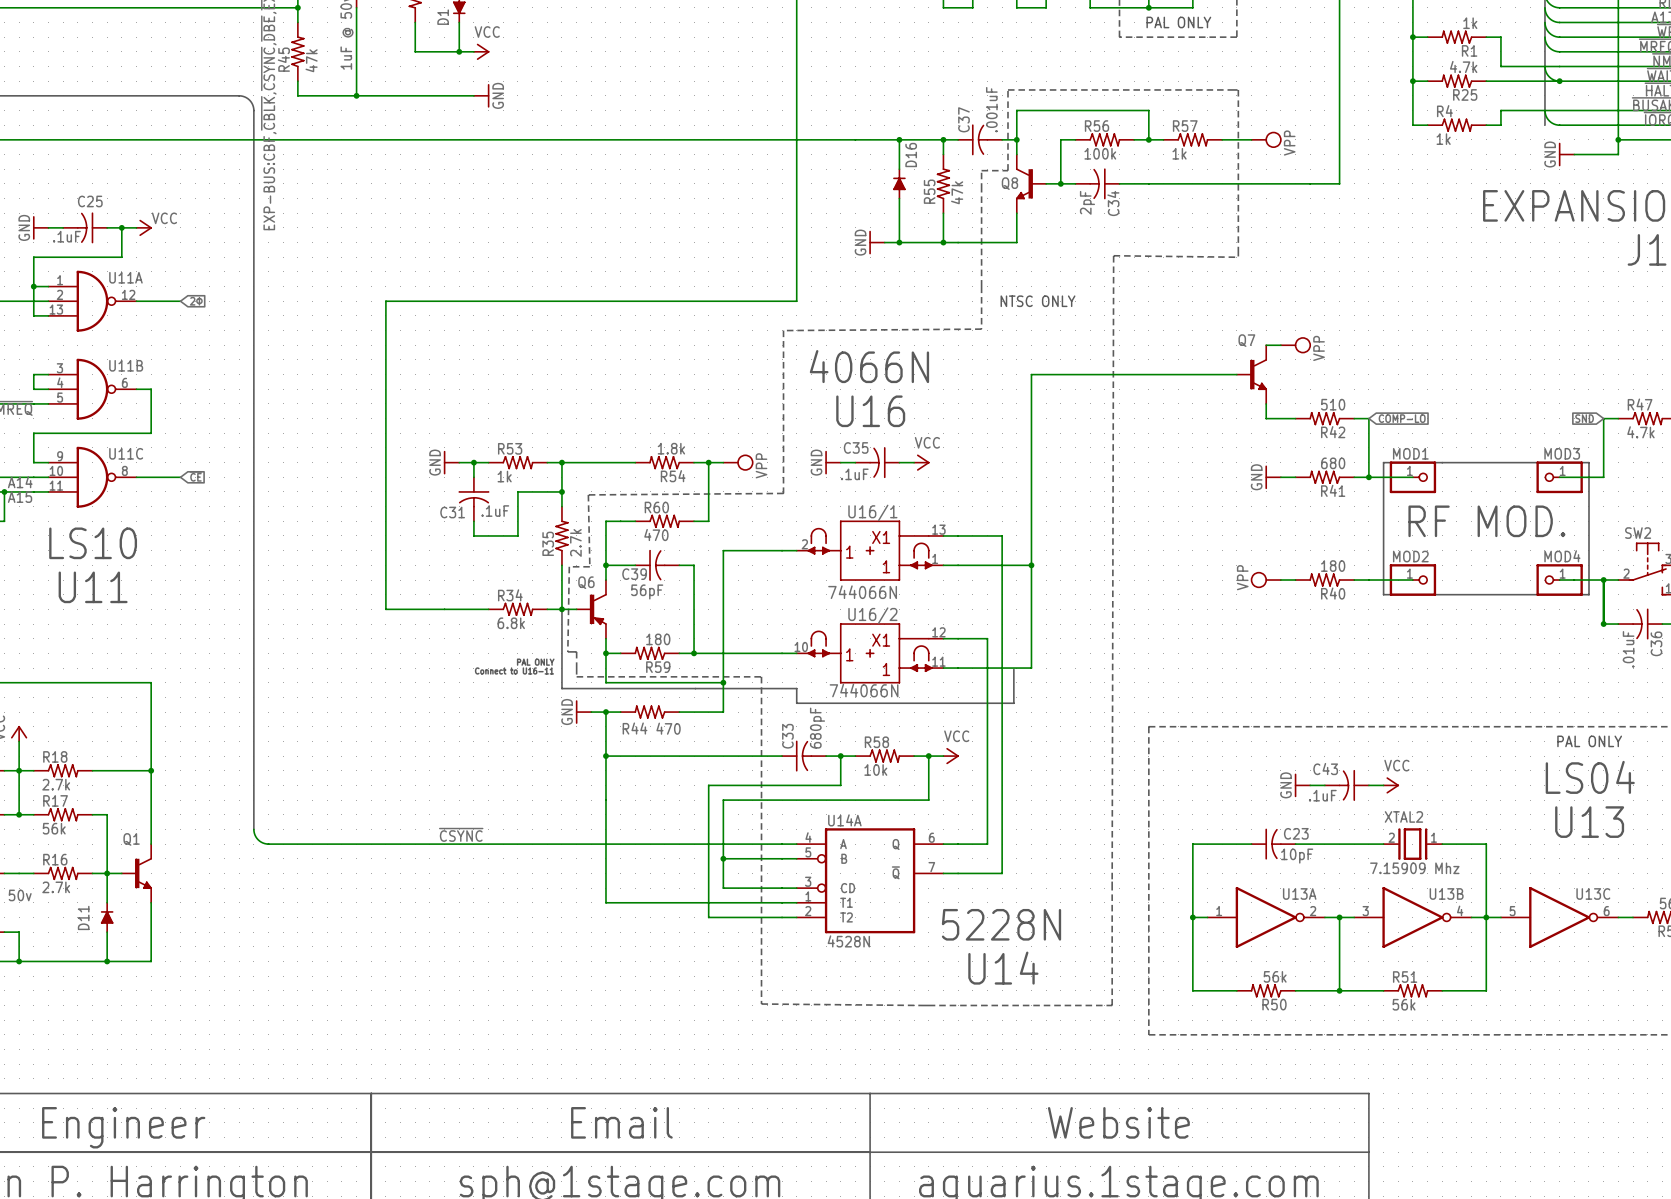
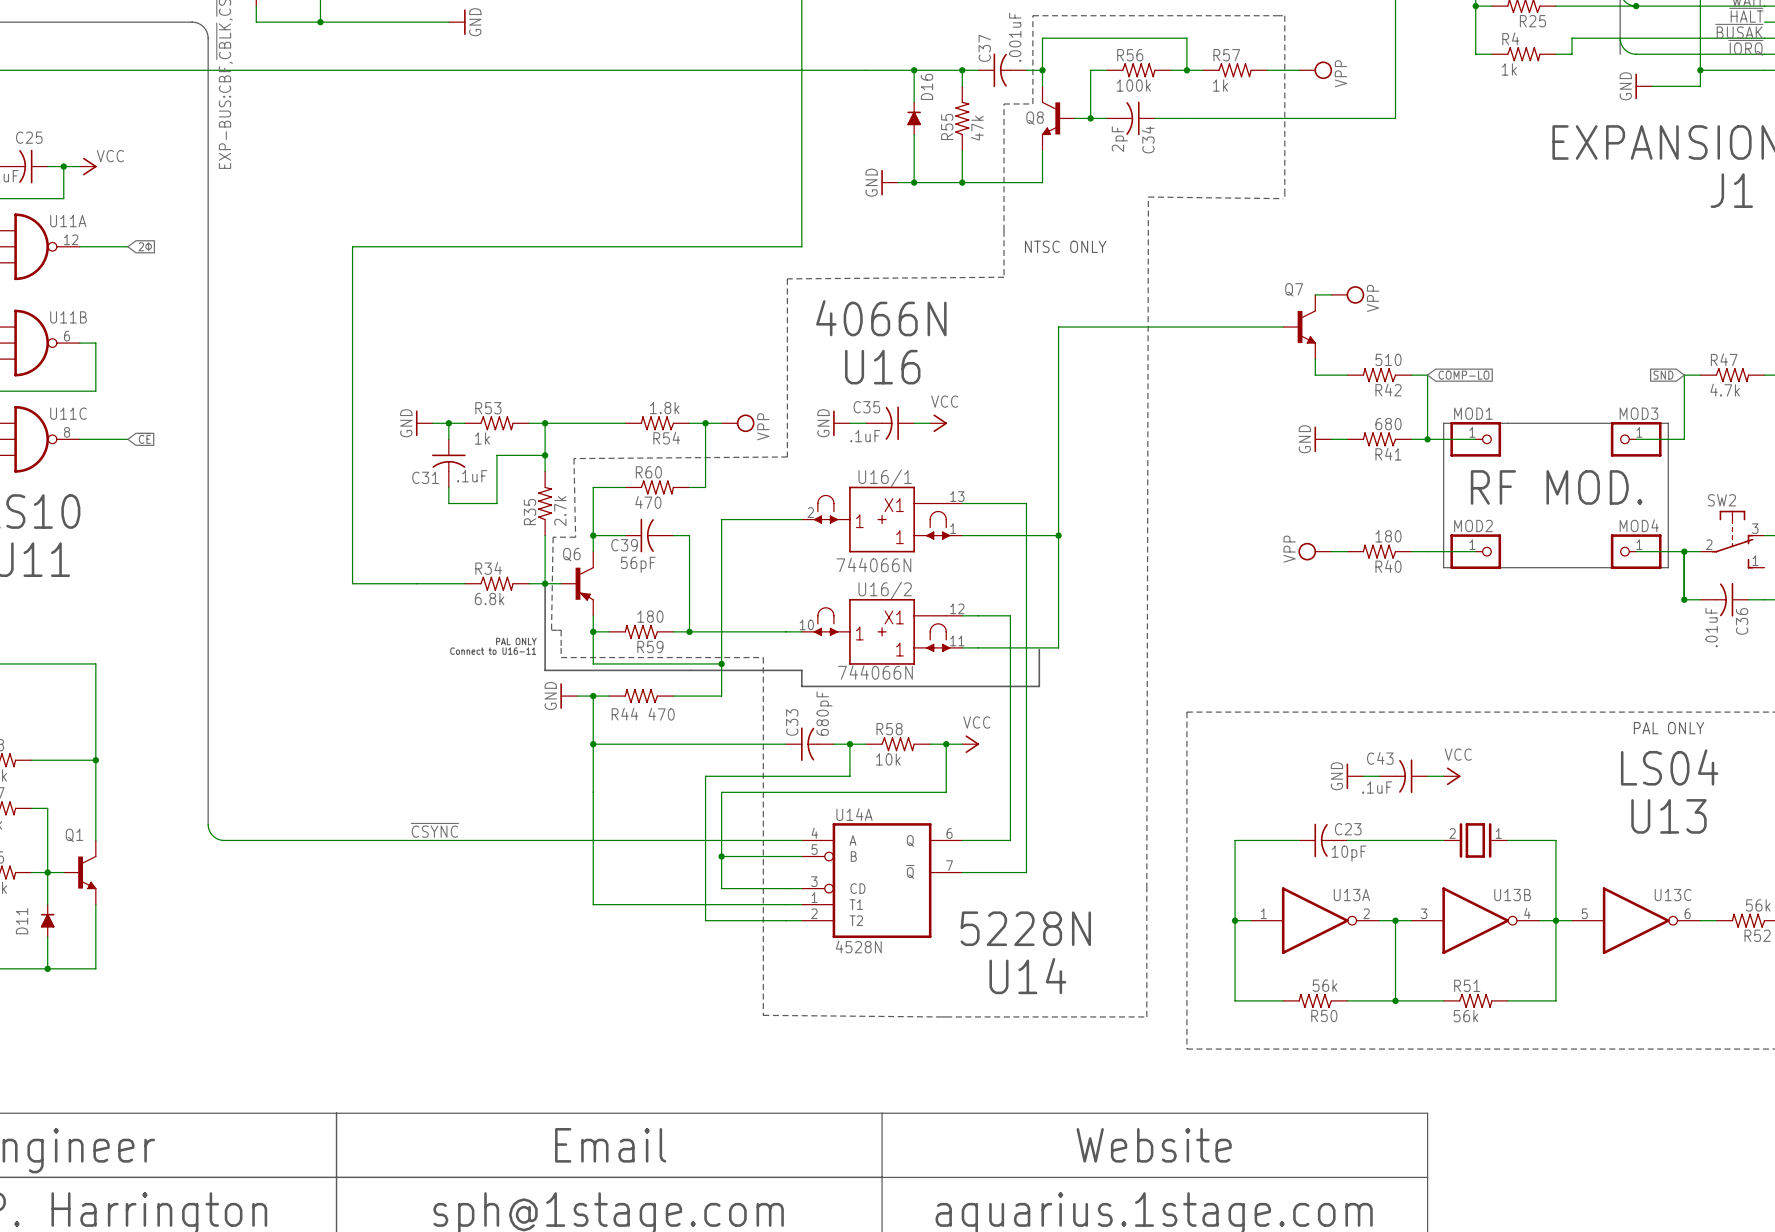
XTAL2 name: XTAL2 (1403, 816) -> none
XTAL2 value: 7.15909 Mhz (1414, 868) -> none

